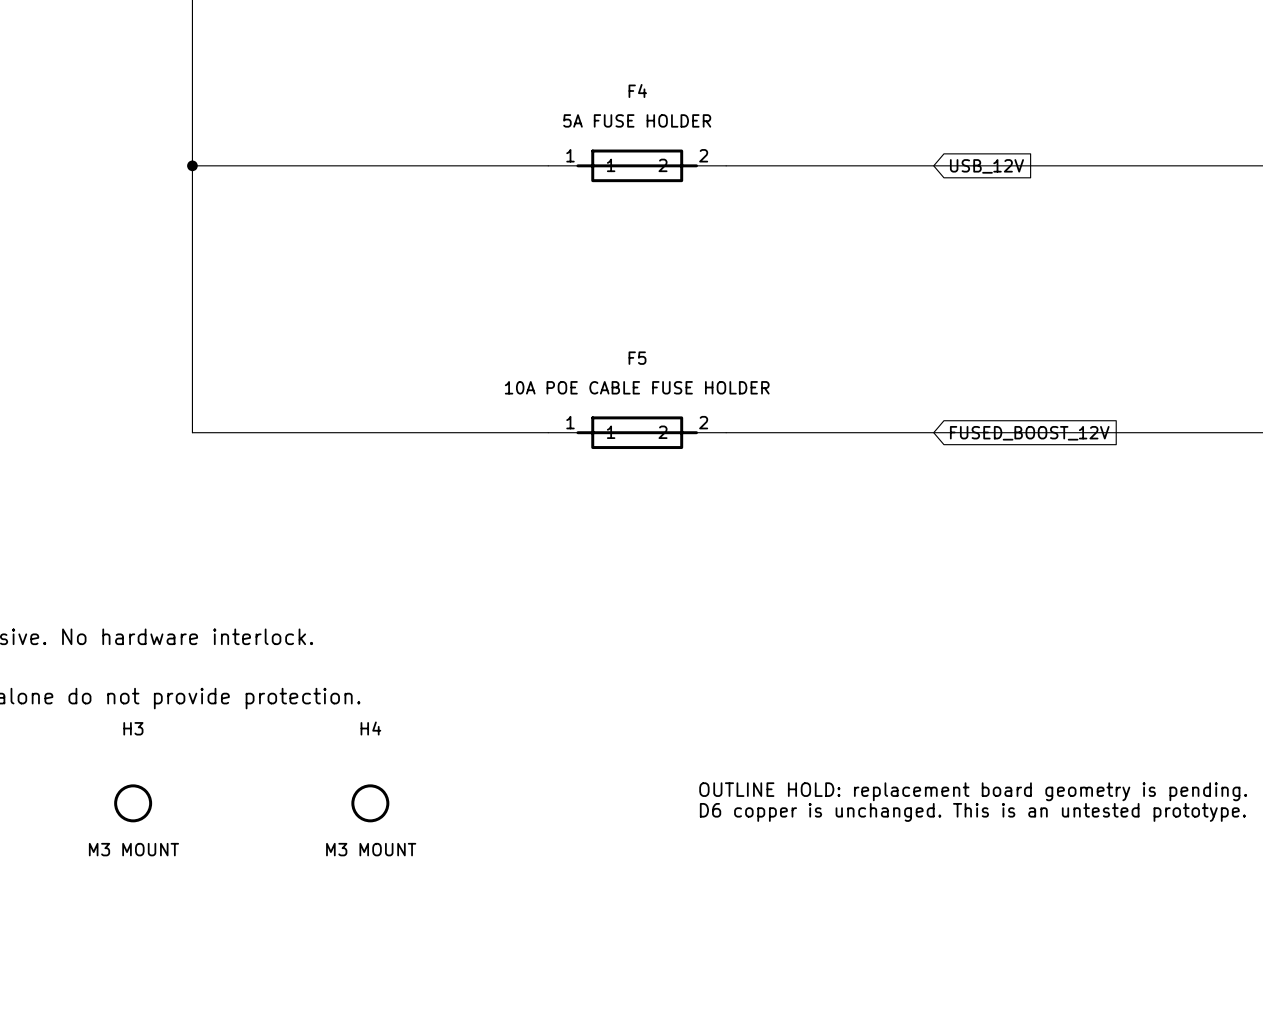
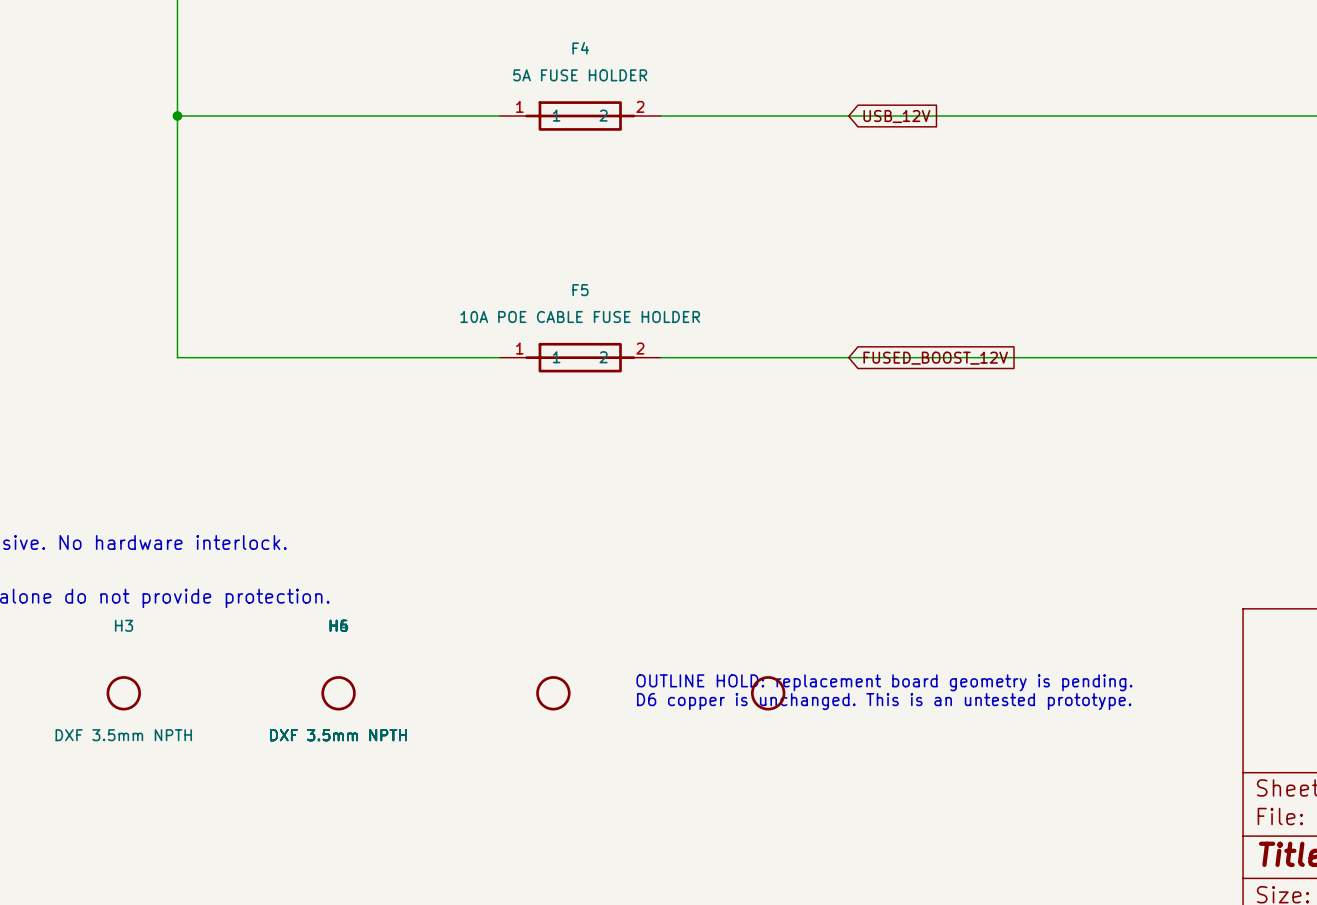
part: none -> DXF 3.5mm NPTH (553, 693)
part: none -> DXF 3.5mm NPTH (768, 693)
H3 value: M3 MOUNT (133, 849) -> DXF 3.5mm NPTH (123, 735)
H4 value: M3 MOUNT (371, 849) -> DXF 3.5mm NPTH (338, 735)

